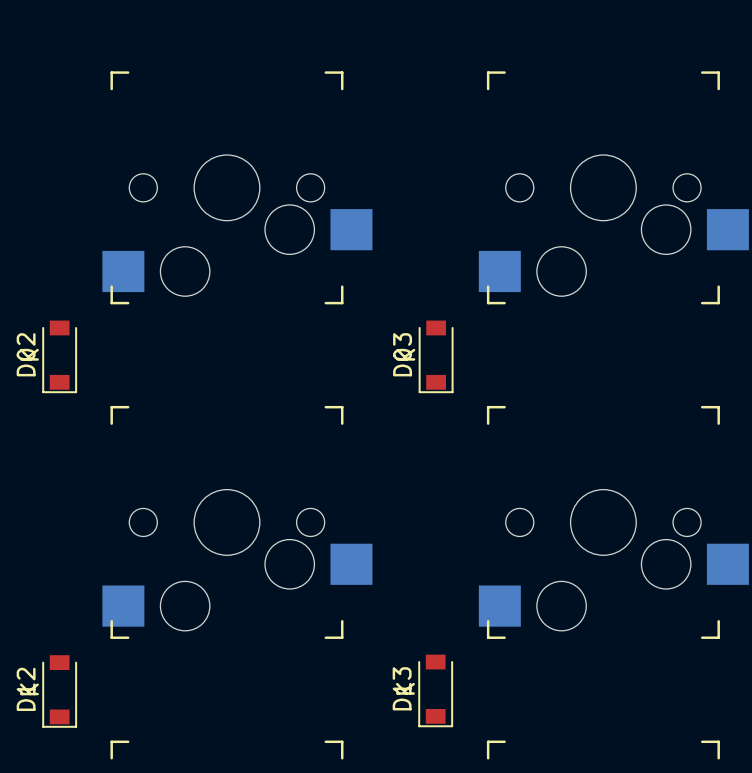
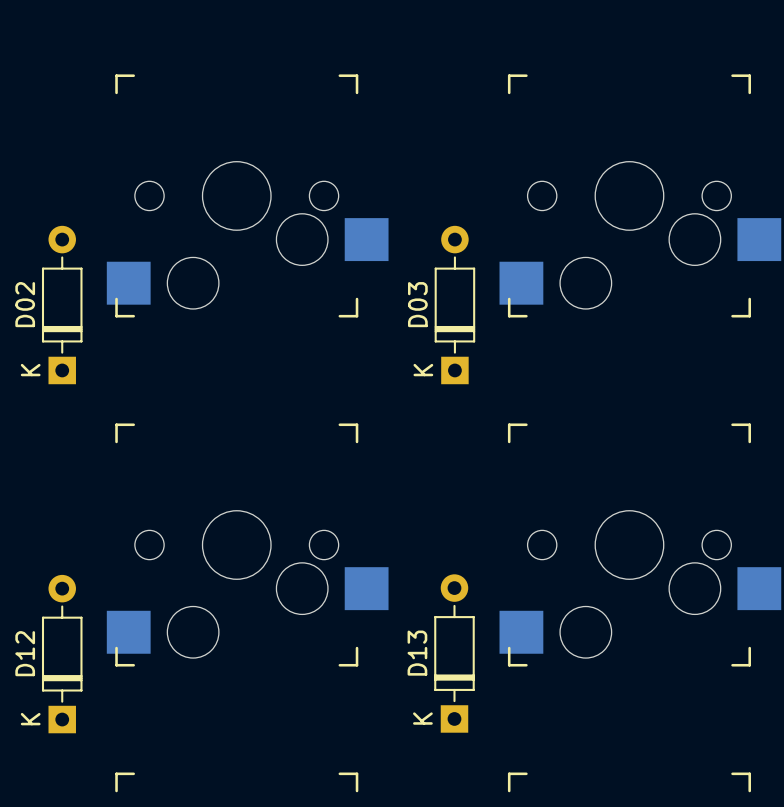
D02 footprint: [42, 320, 78, 394] -> [41, 225, 83, 385]
D03 footprint: [418, 320, 454, 394] -> [434, 225, 476, 385]
D13 footprint: [418, 654, 454, 728] -> [434, 574, 475, 733]
D12 footprint: [42, 655, 78, 728] -> [41, 574, 83, 734]

